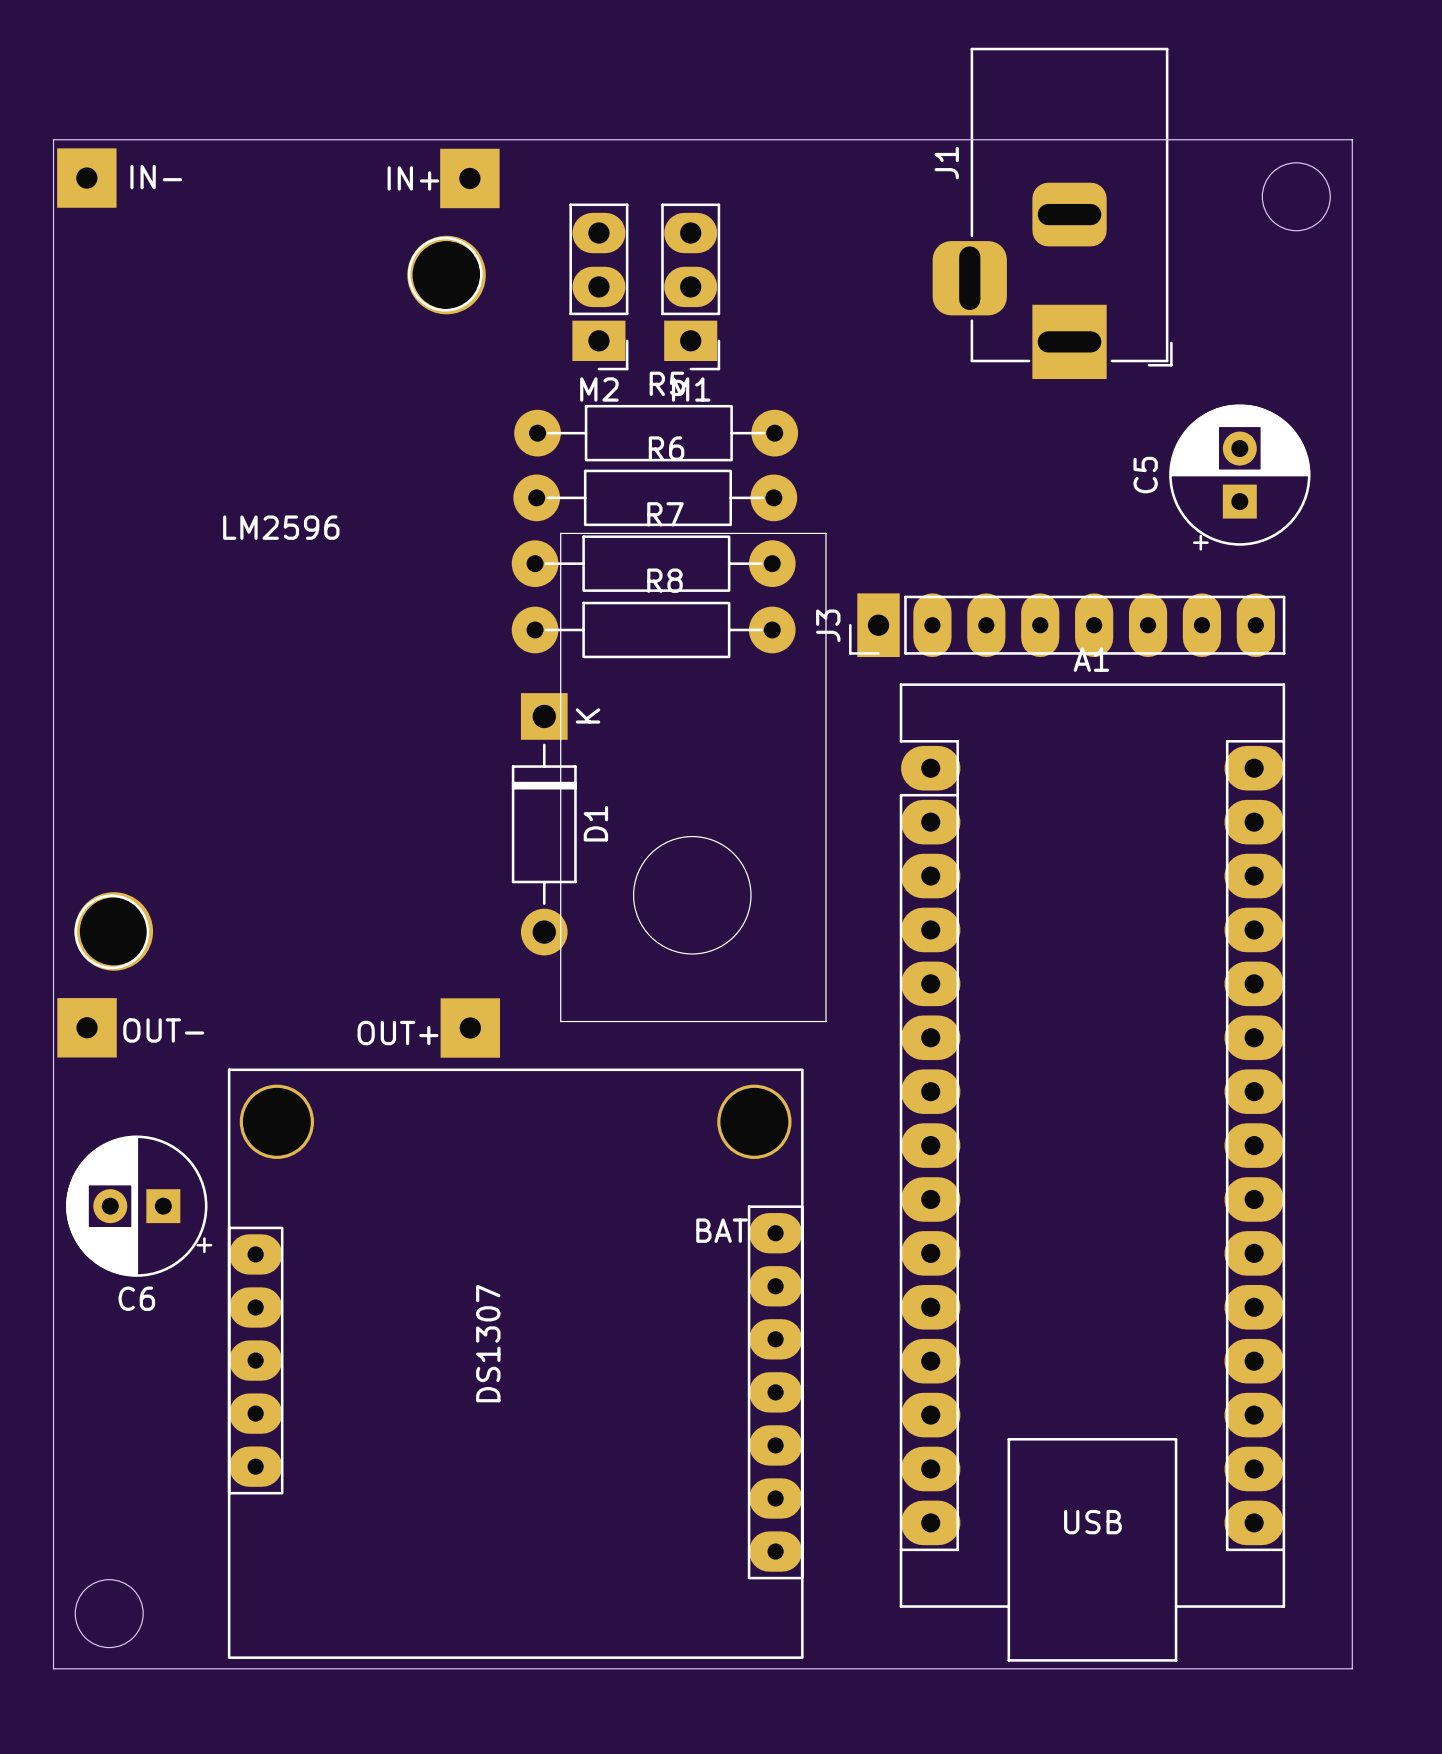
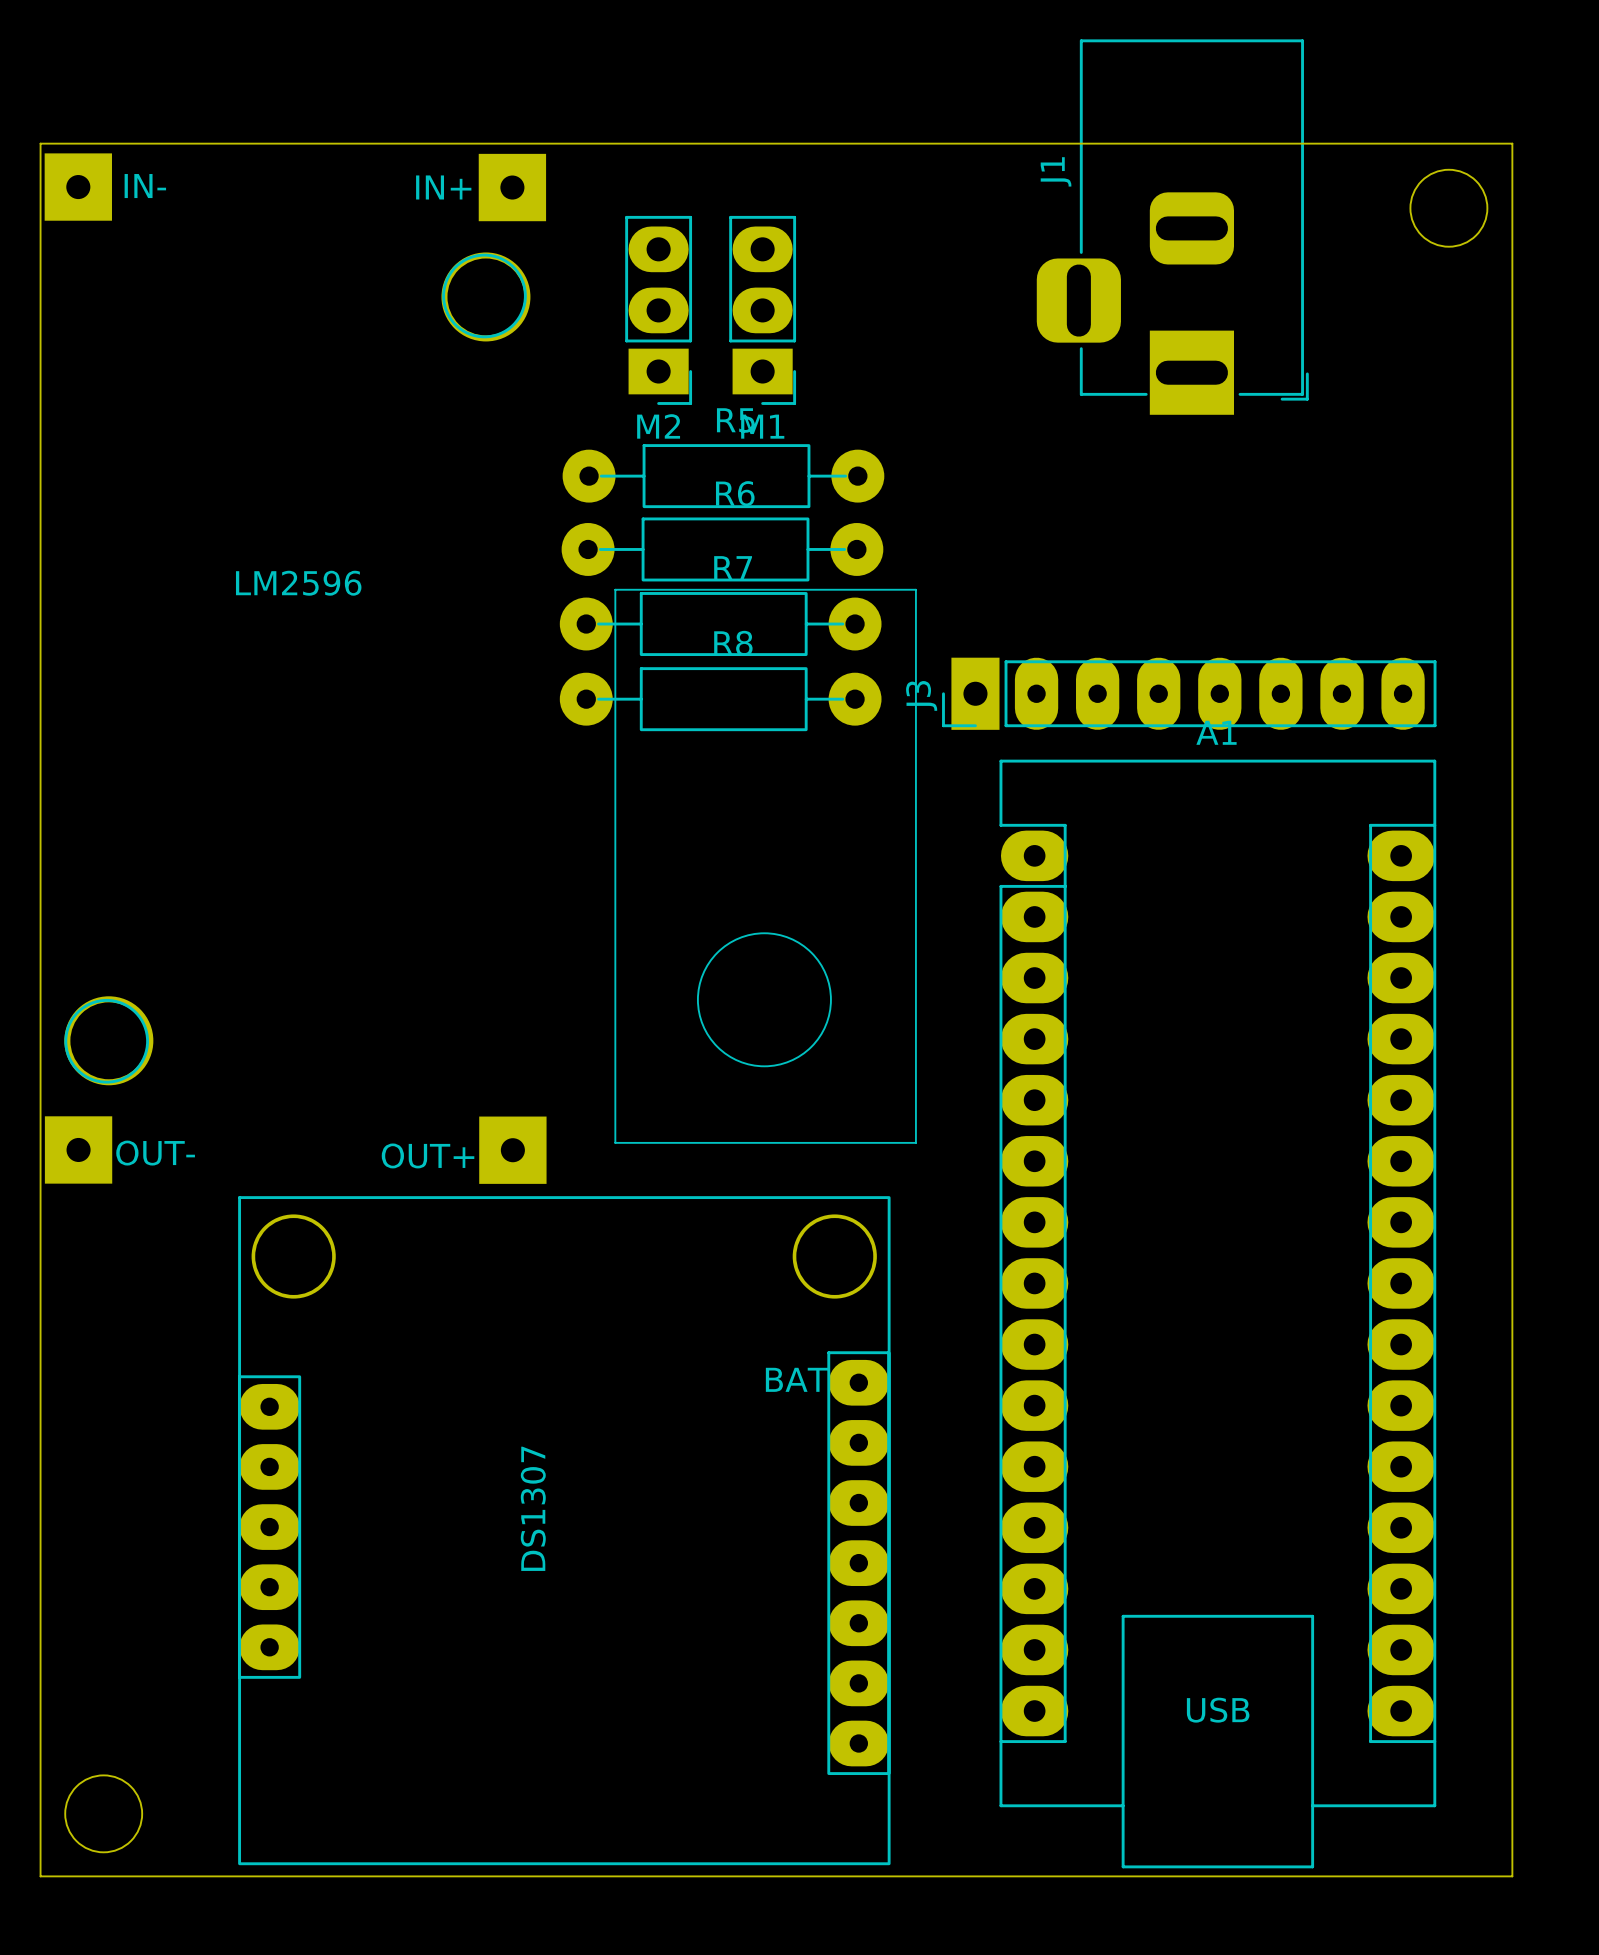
C5: (1239, 477) -> none
D1: (544, 824) -> none
C6: (139, 1206) -> none

